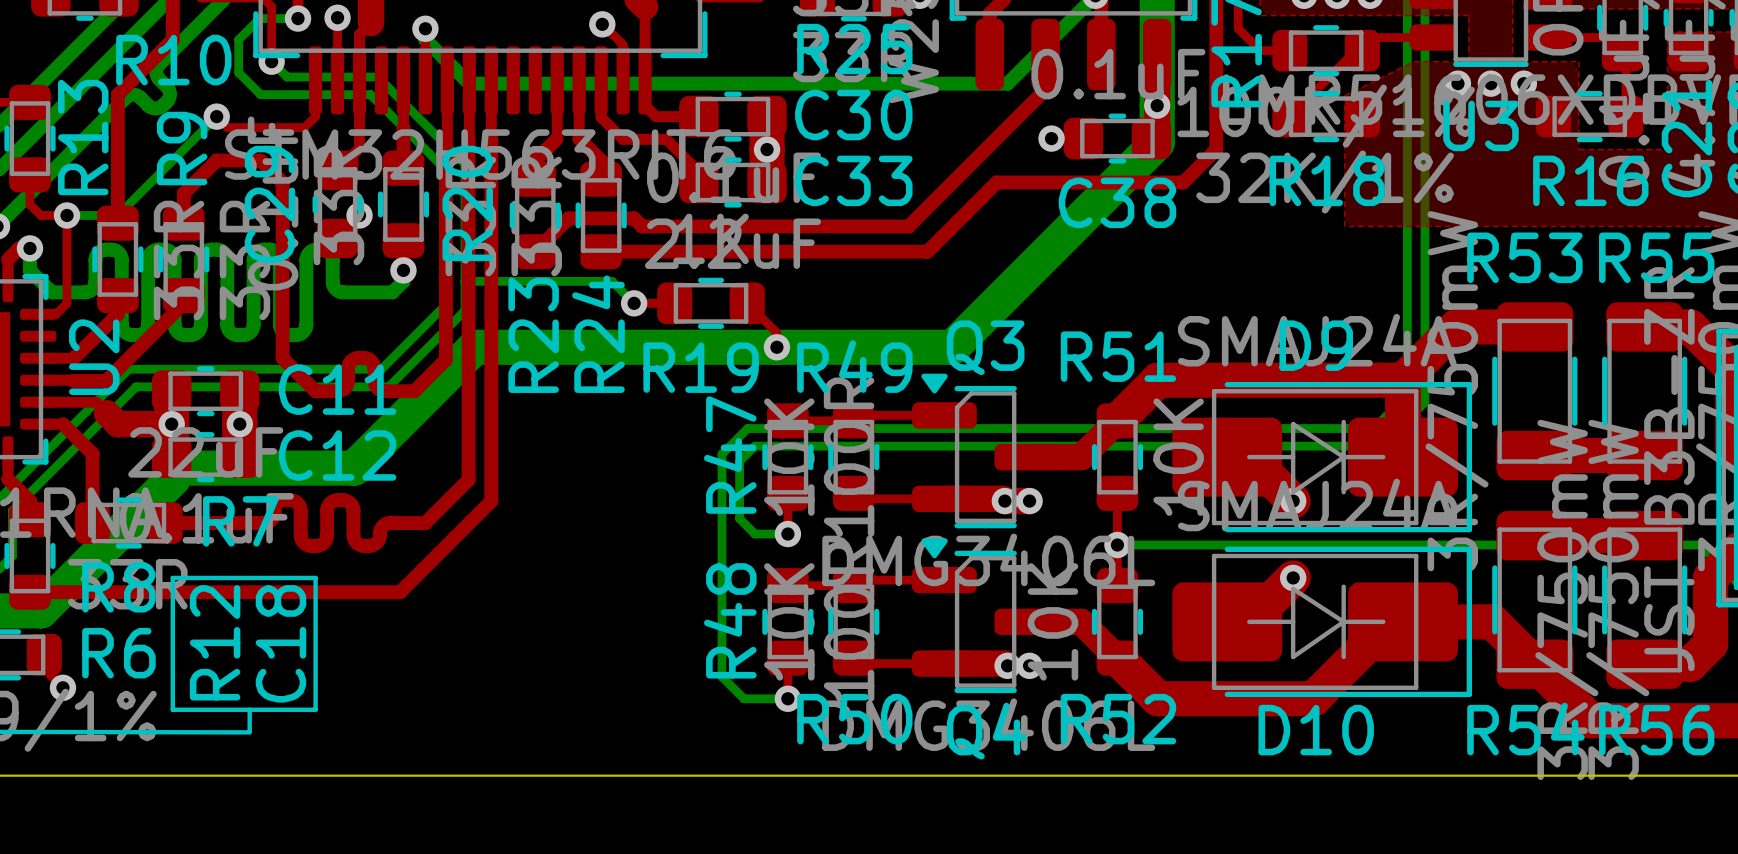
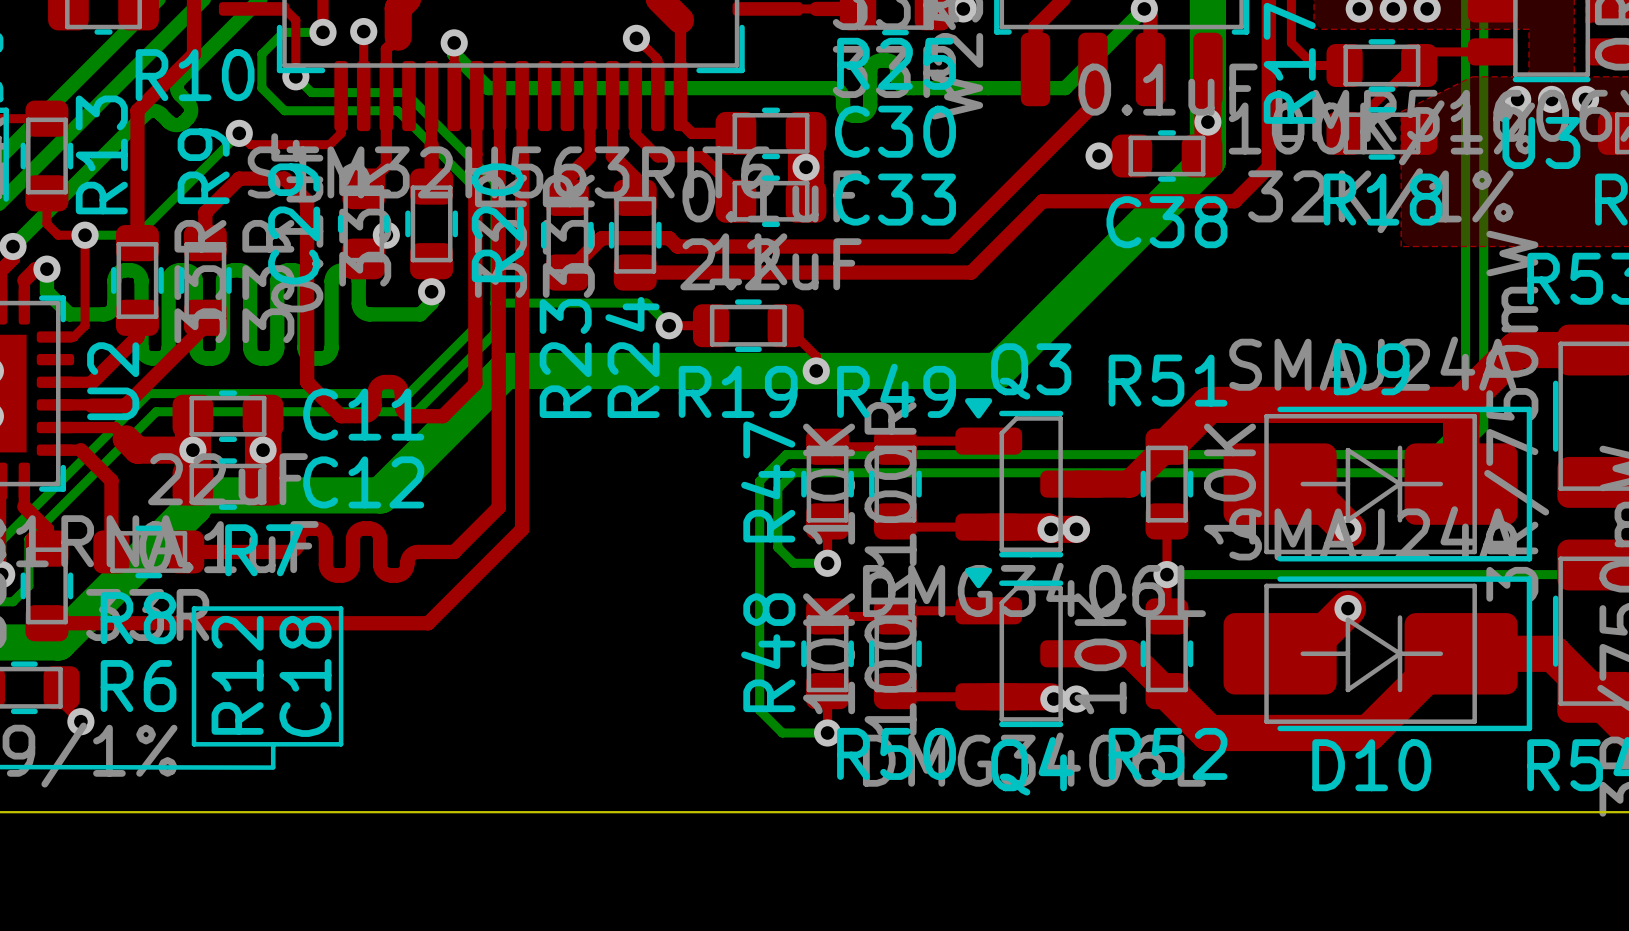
bottom track: (458, 72) (469, 83) (1007, 83) (1018, 72) -> (488, 88) (833, 88) (841, 94) (845, 111) (853, 115) (862, 115) (869, 109) (870, 68) (873, 63) (879, 60) (888, 60) (894, 63) (897, 68) (898, 81) (906, 88) (1065, 88)

